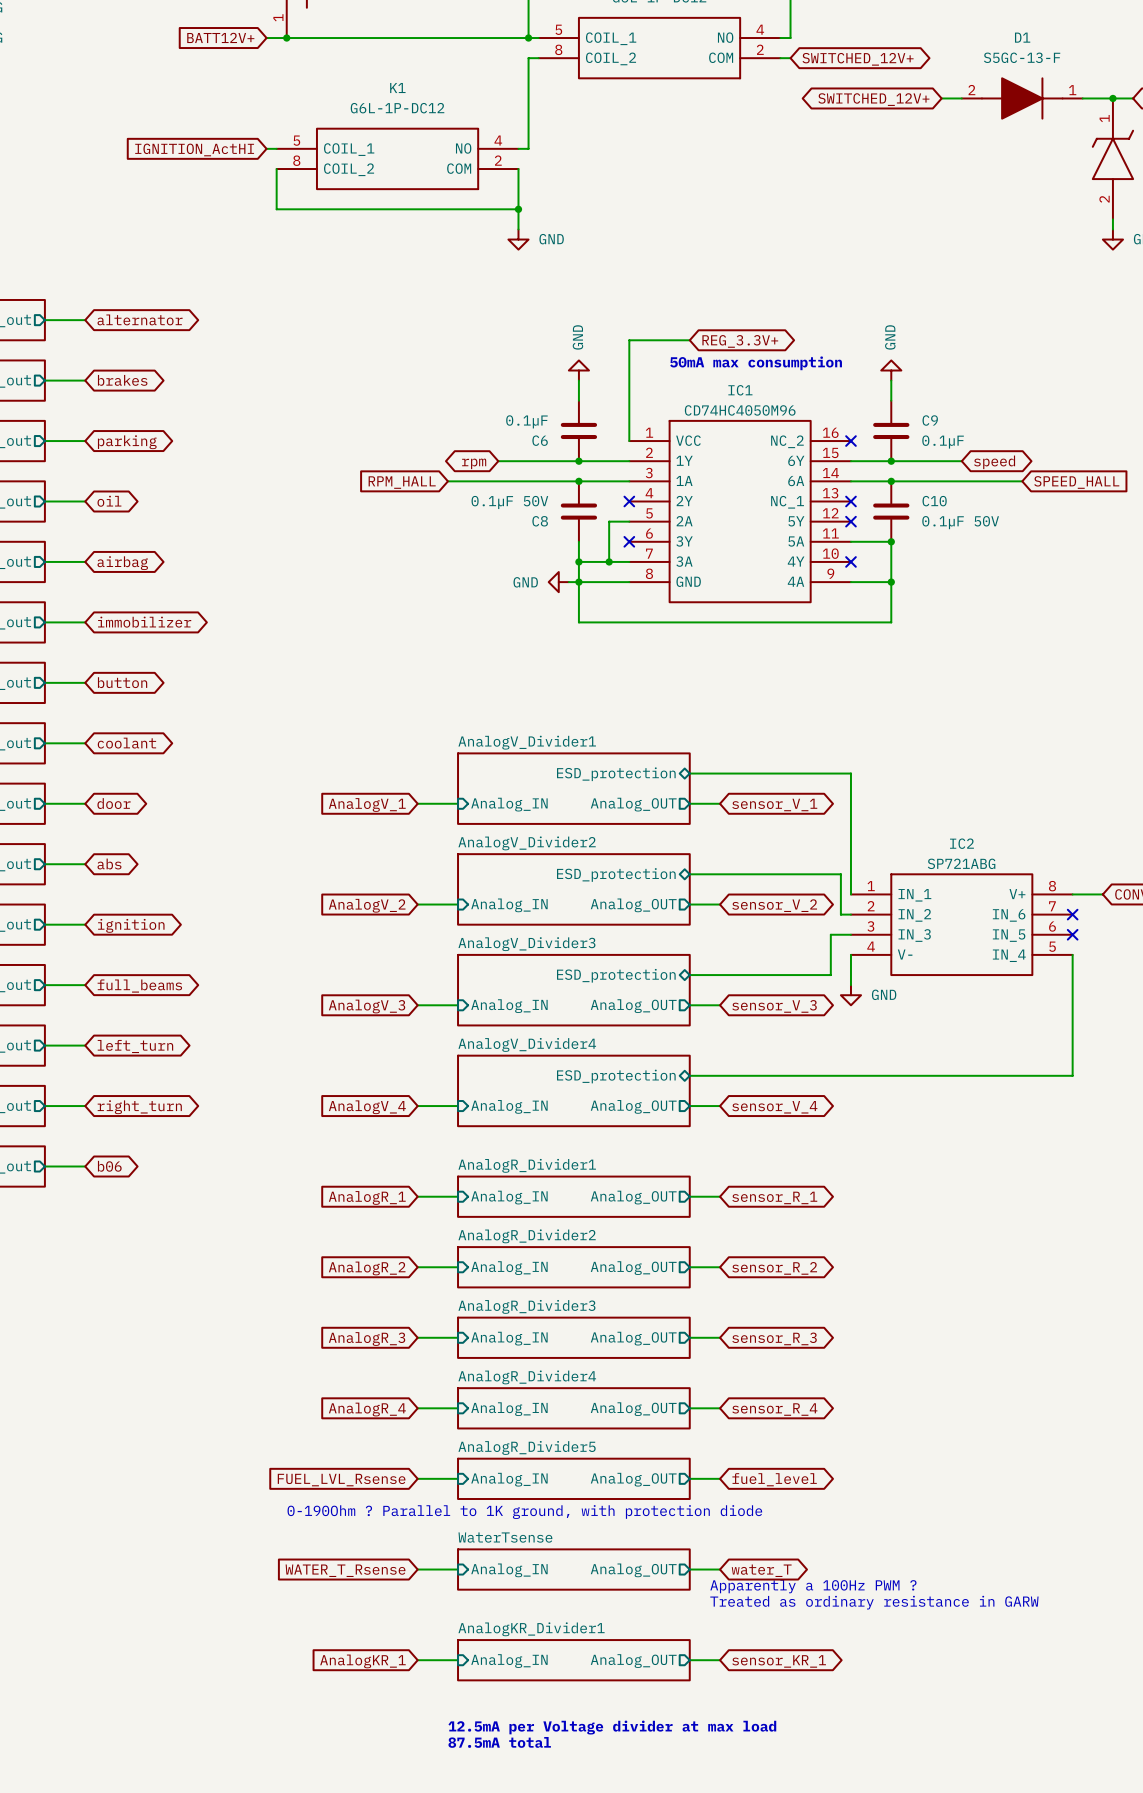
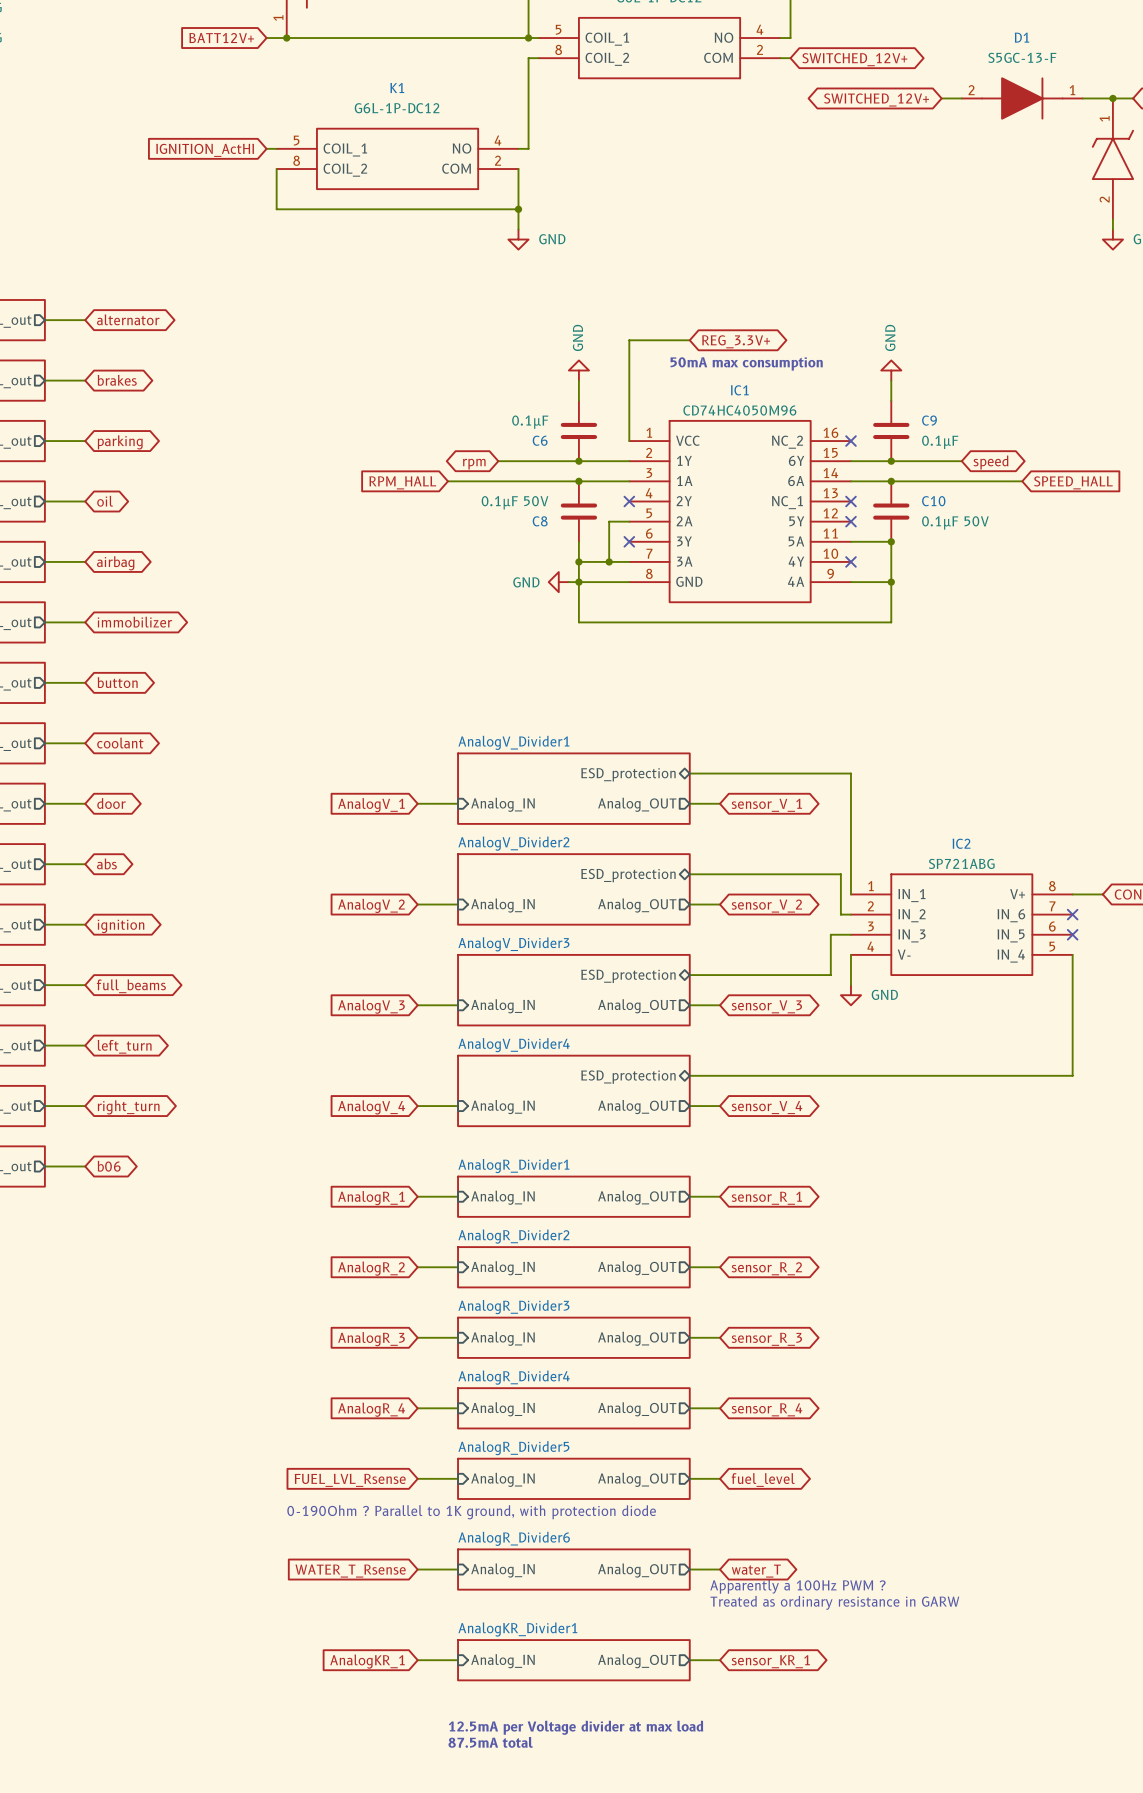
sheet WaterTsense name: WaterTsense (505, 1537) -> AnalogR_Divider6 (514, 1538)

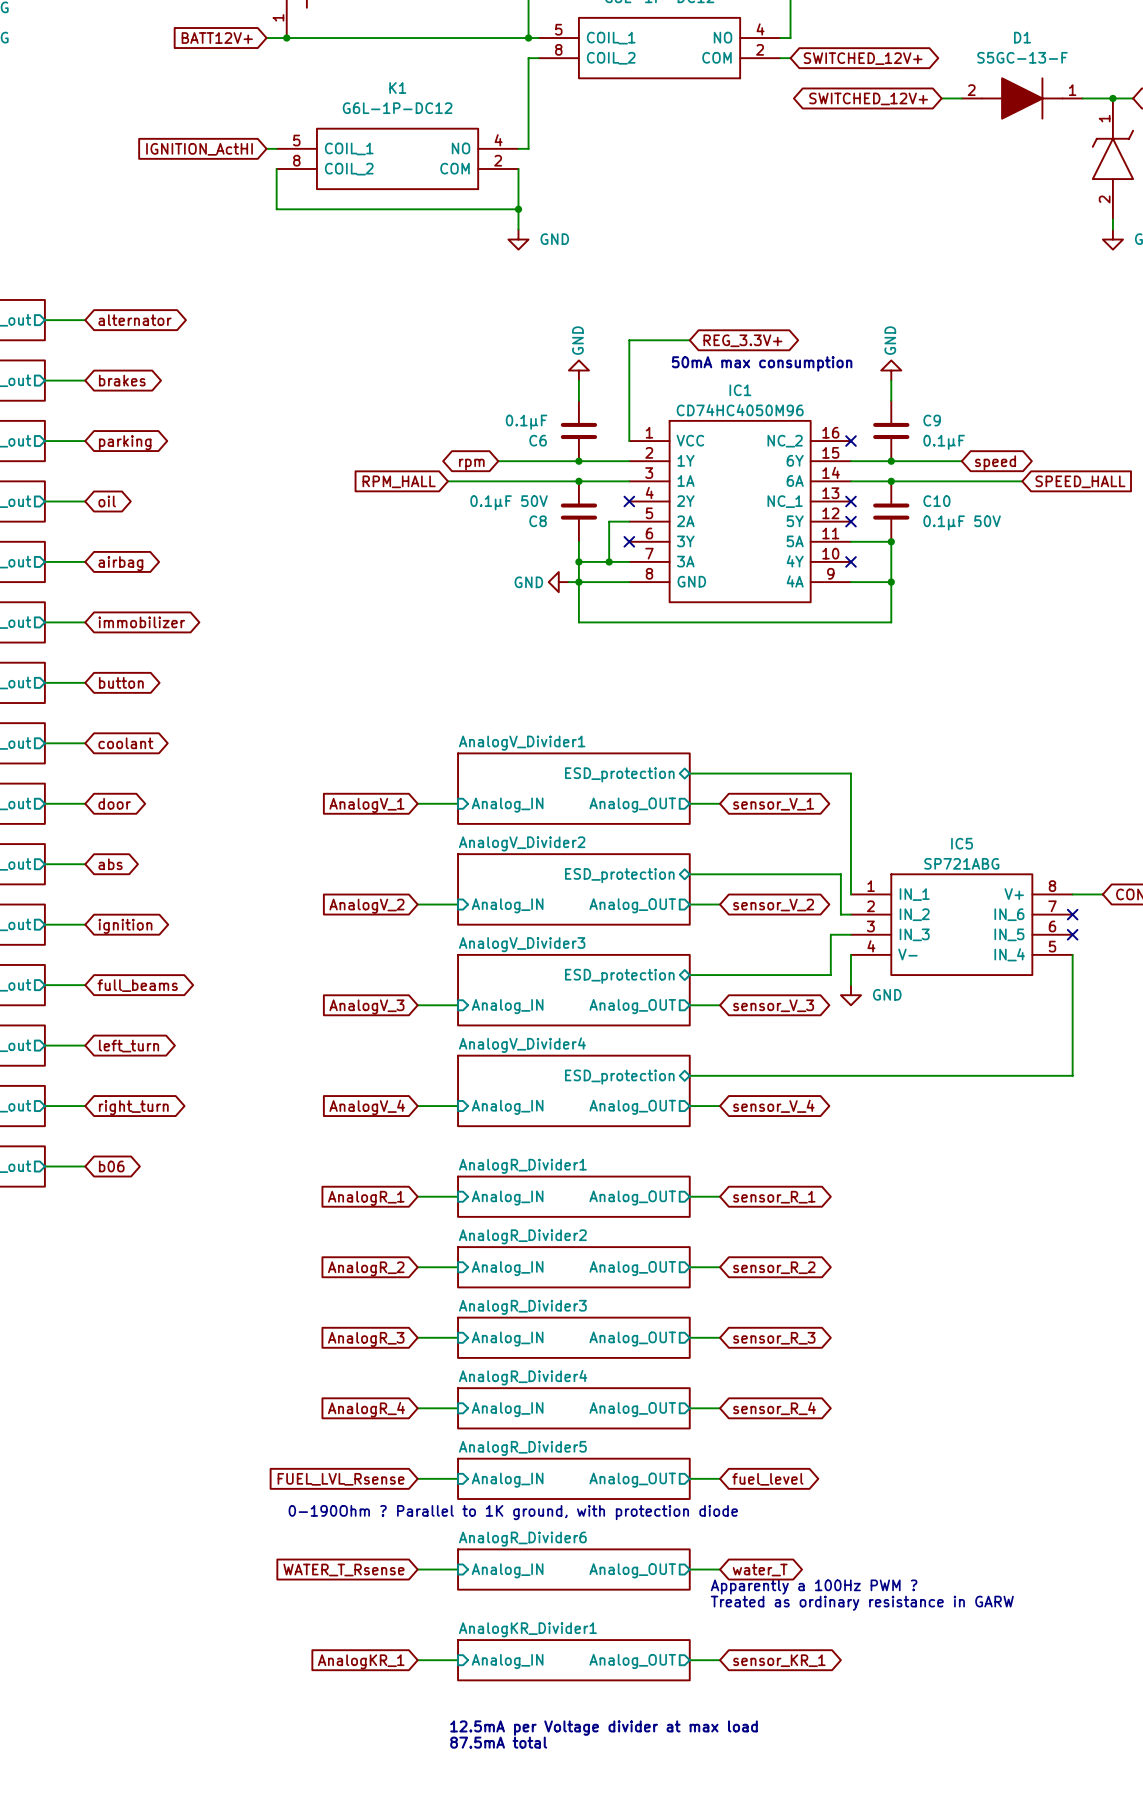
IC2 name: IC2 (961, 843) -> IC5 (962, 843)

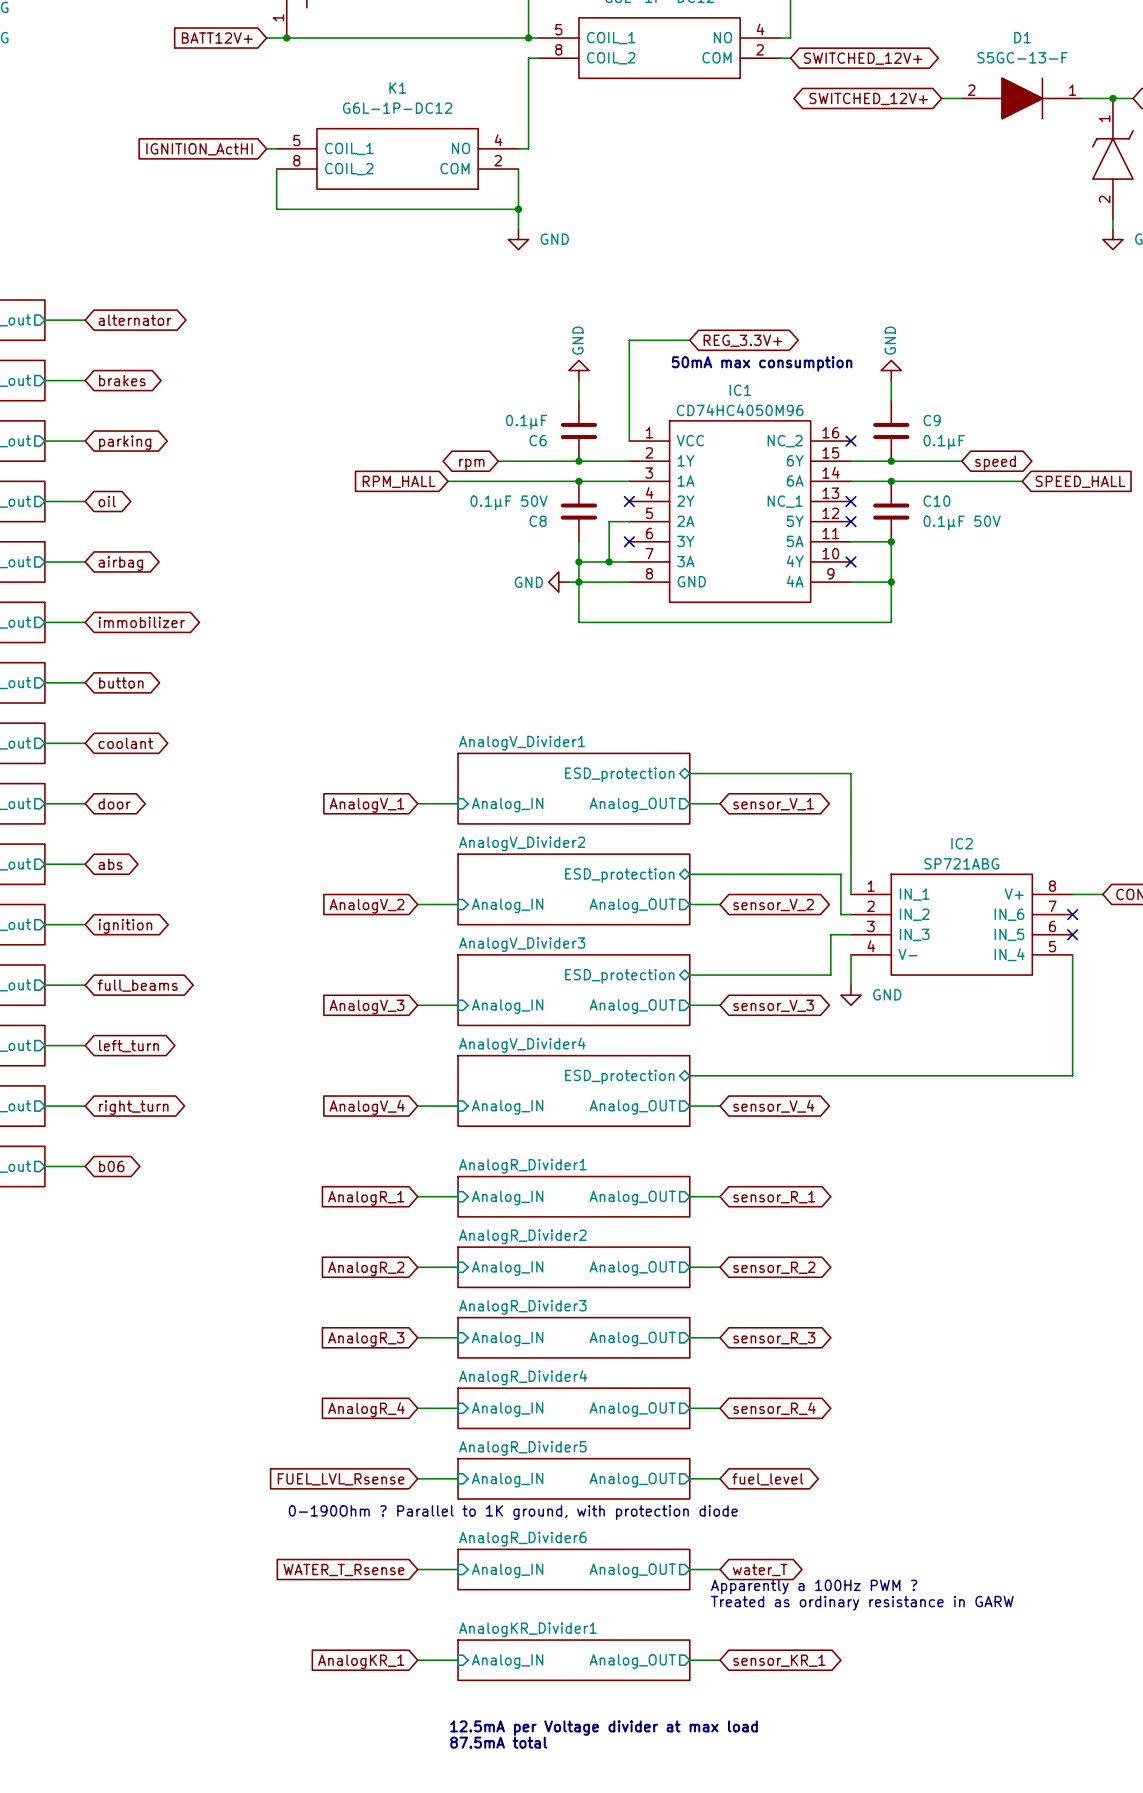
IC5 name: IC5 (962, 843) -> IC2 (962, 843)

